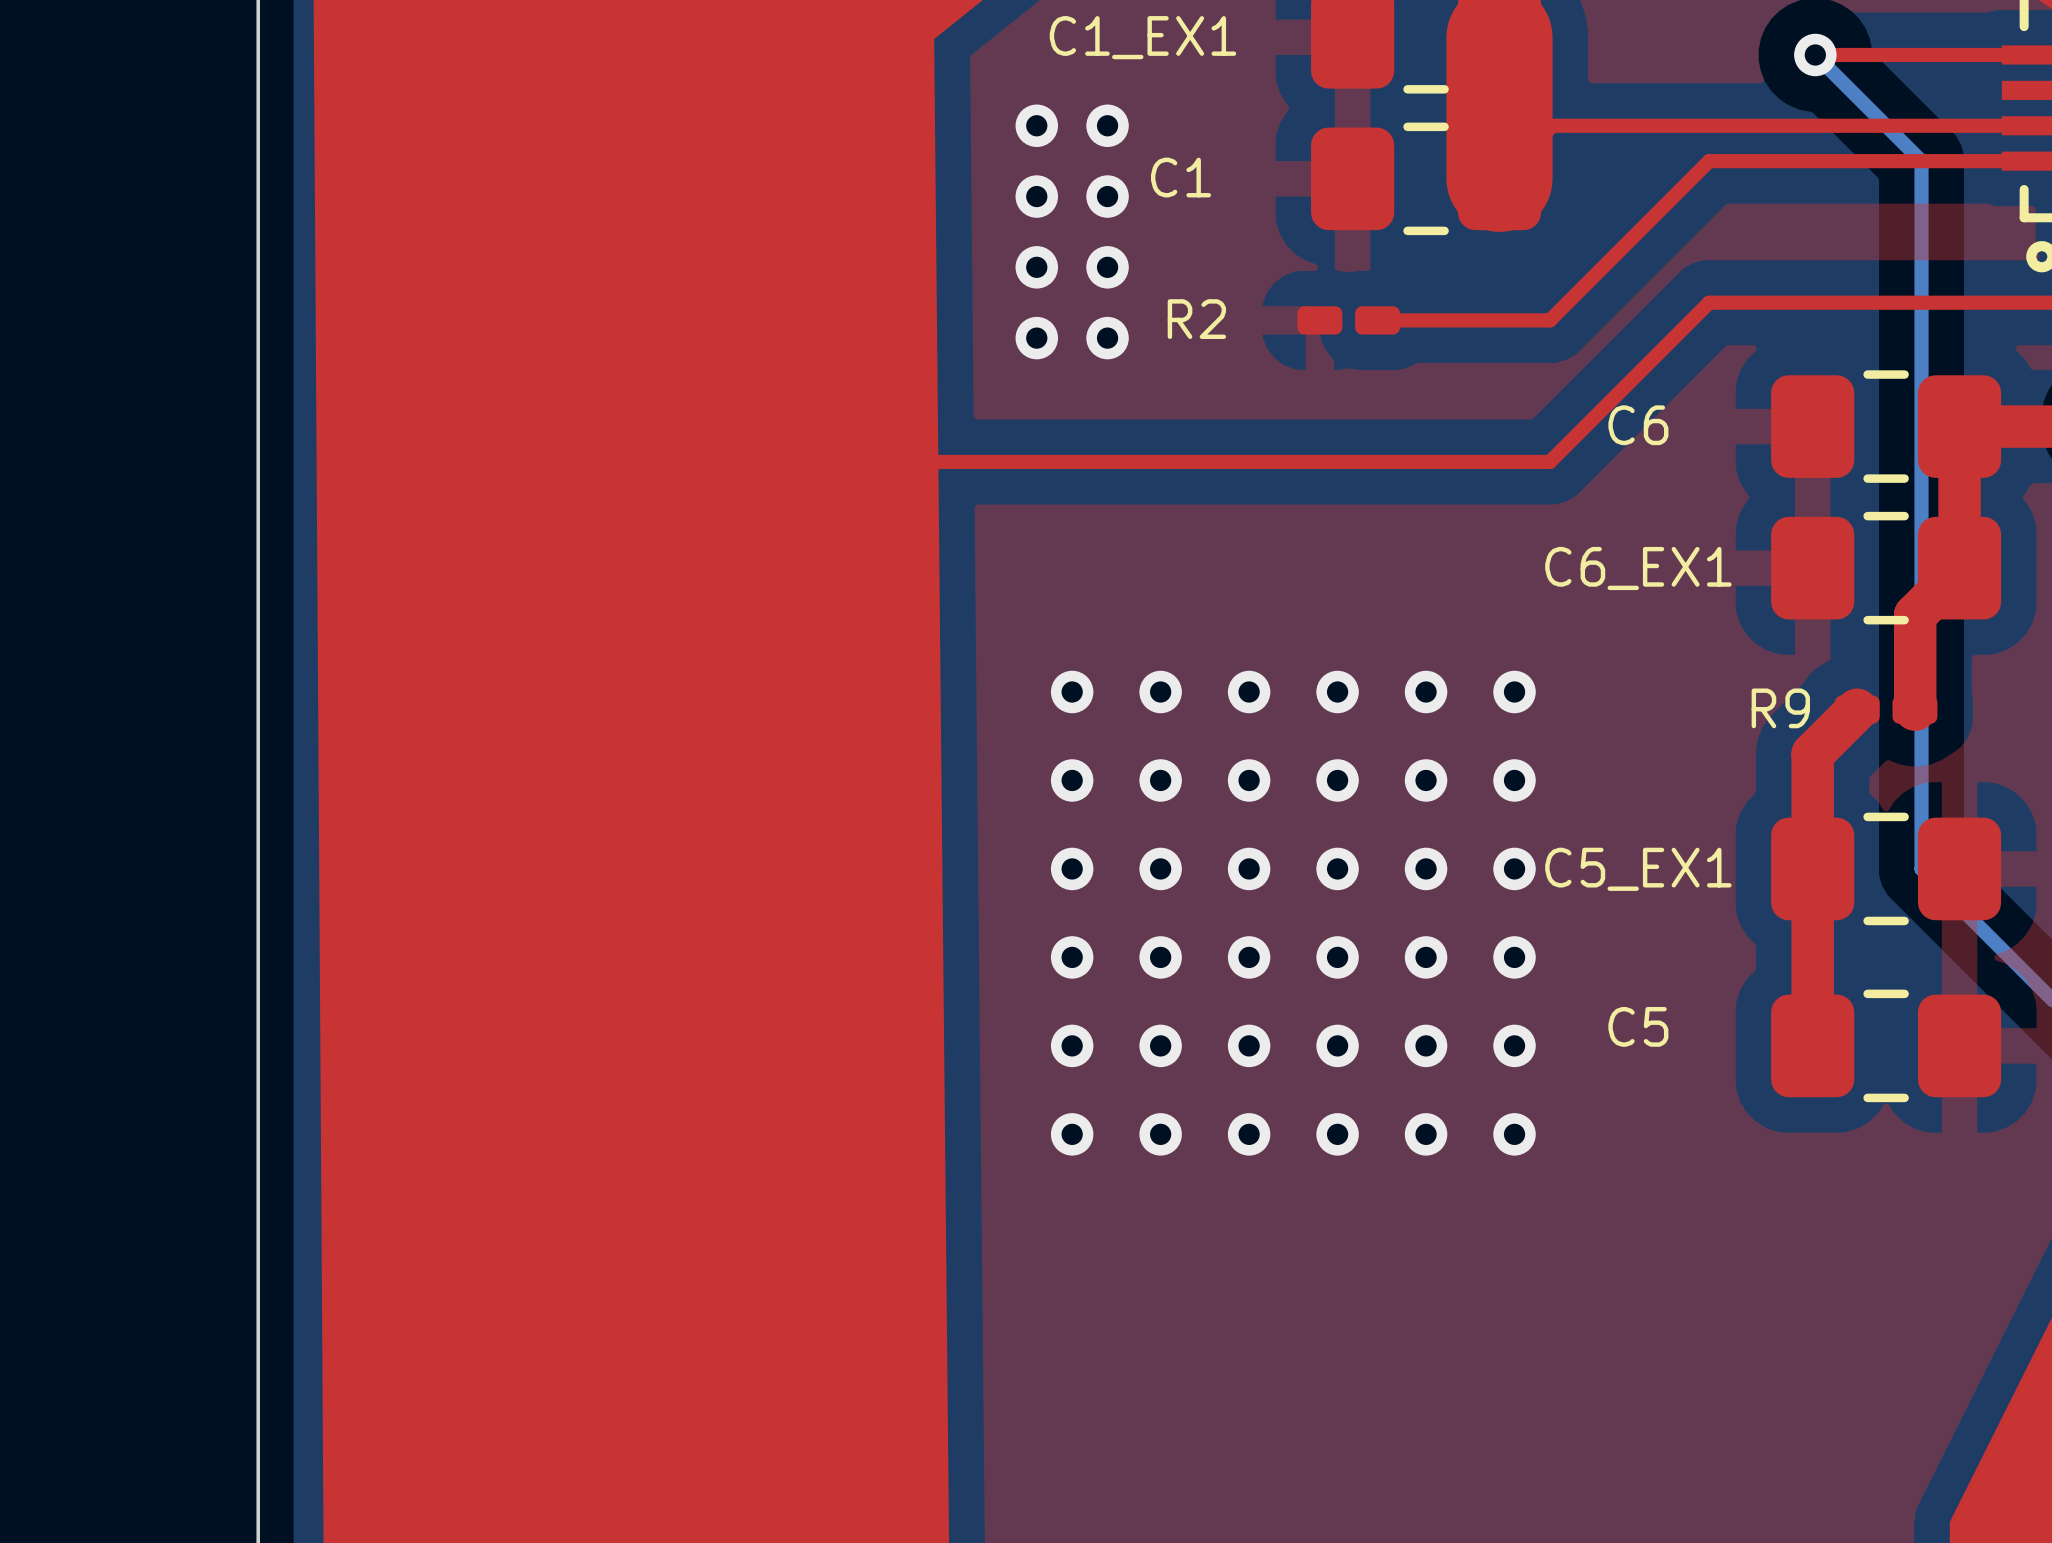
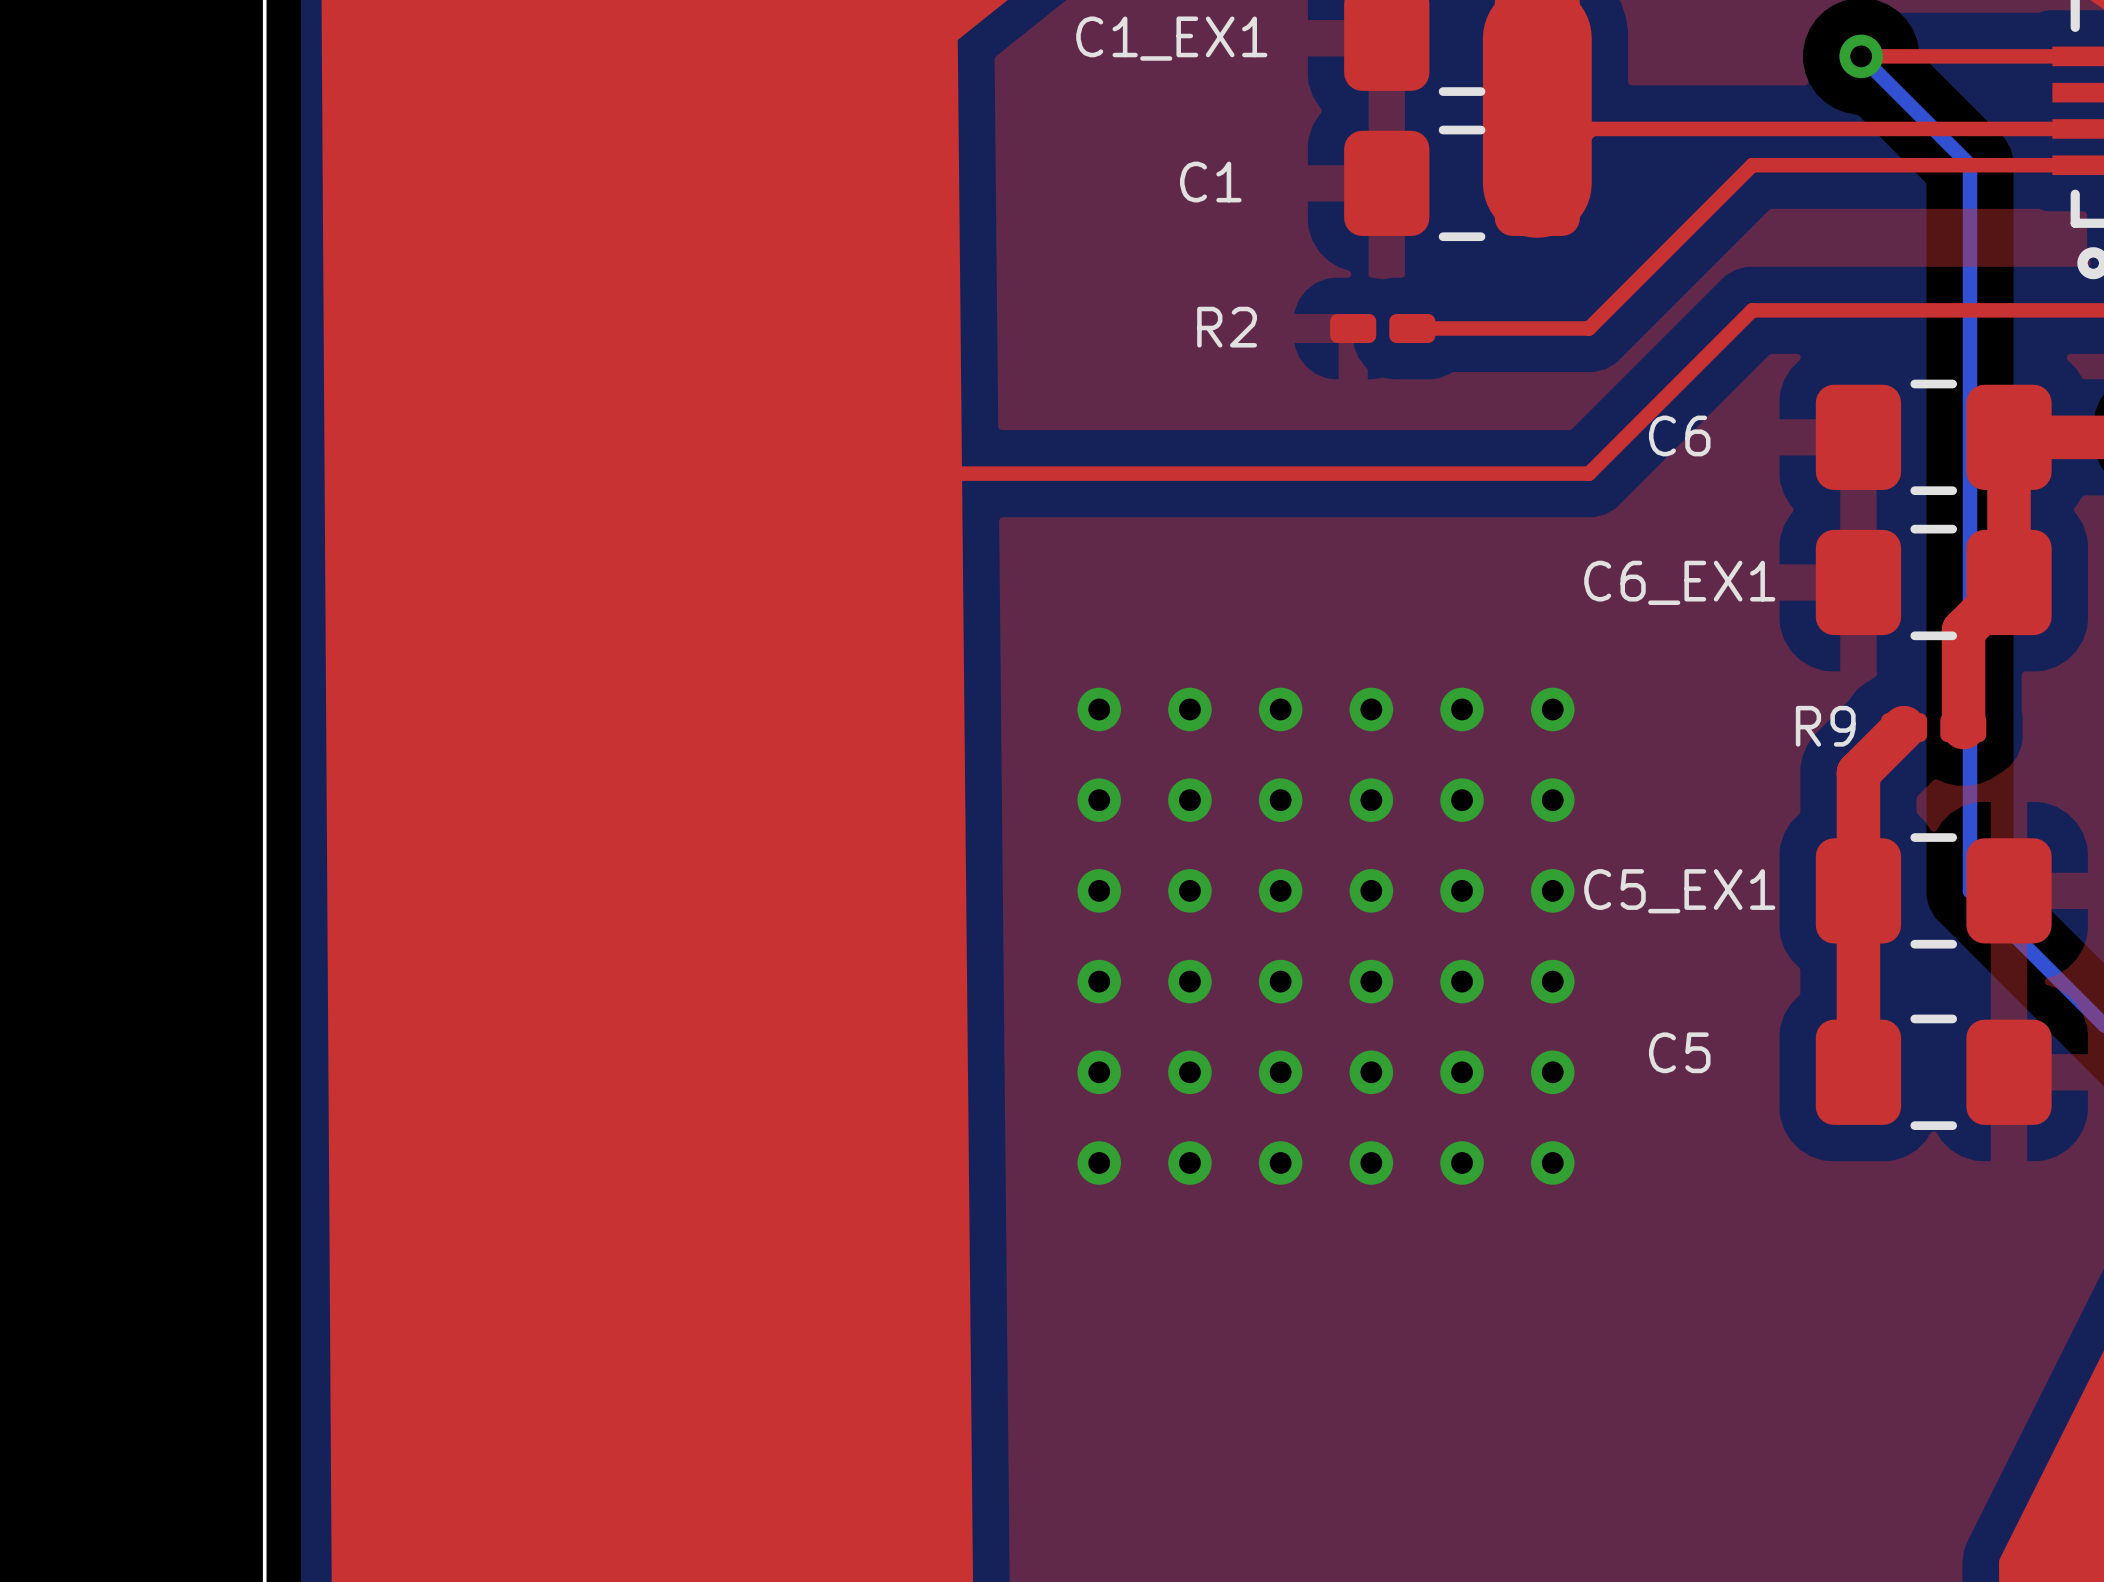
via: (1036, 125) -> none
via: (1107, 125) -> none
via: (1036, 196) -> none
via: (1107, 196) -> none
via: (1036, 267) -> none
via: (1107, 267) -> none
via: (1036, 338) -> none
via: (1107, 338) -> none

